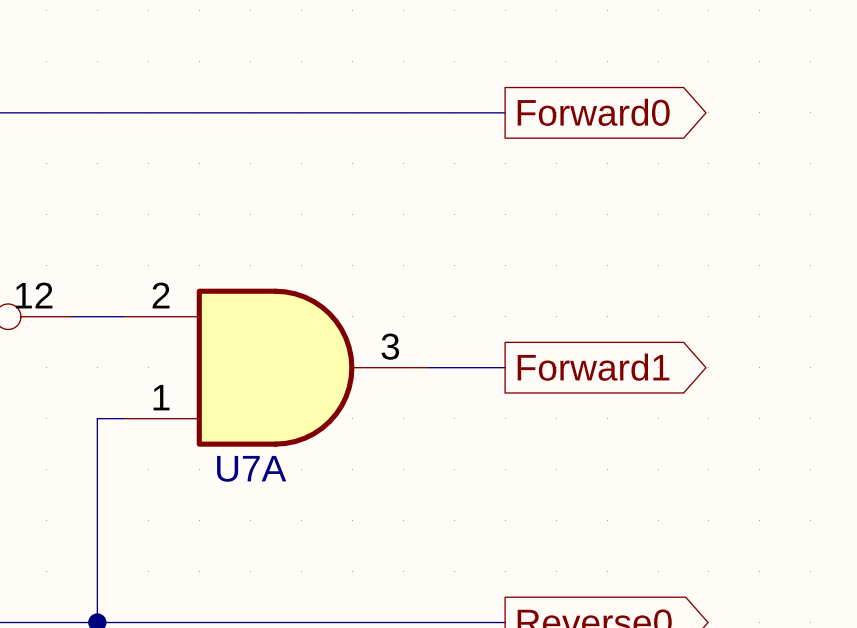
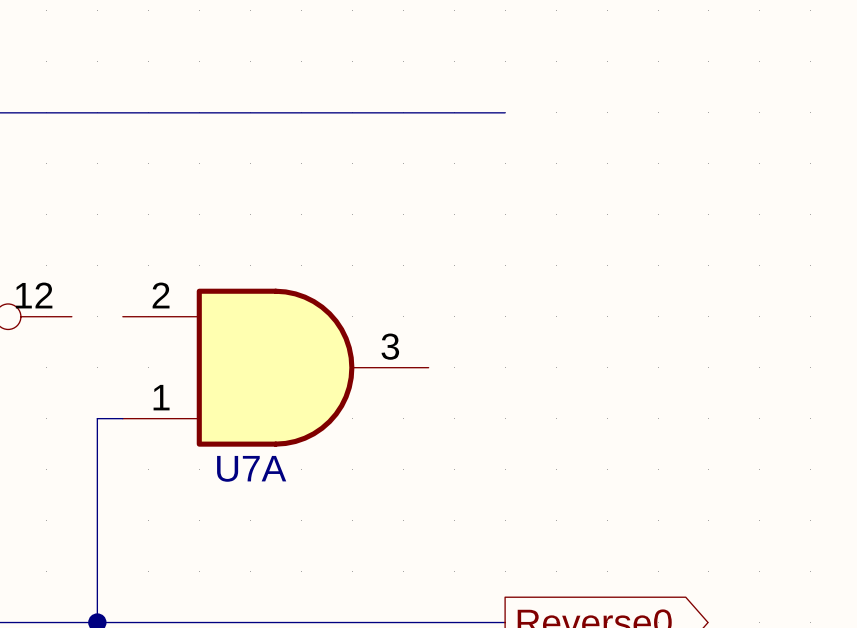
global label: Forward0 (593, 112) -> none
wire: (71, 316) (122, 316) -> none
wire: (428, 367) (505, 367) -> none
global label: Forward1 (593, 367) -> none

